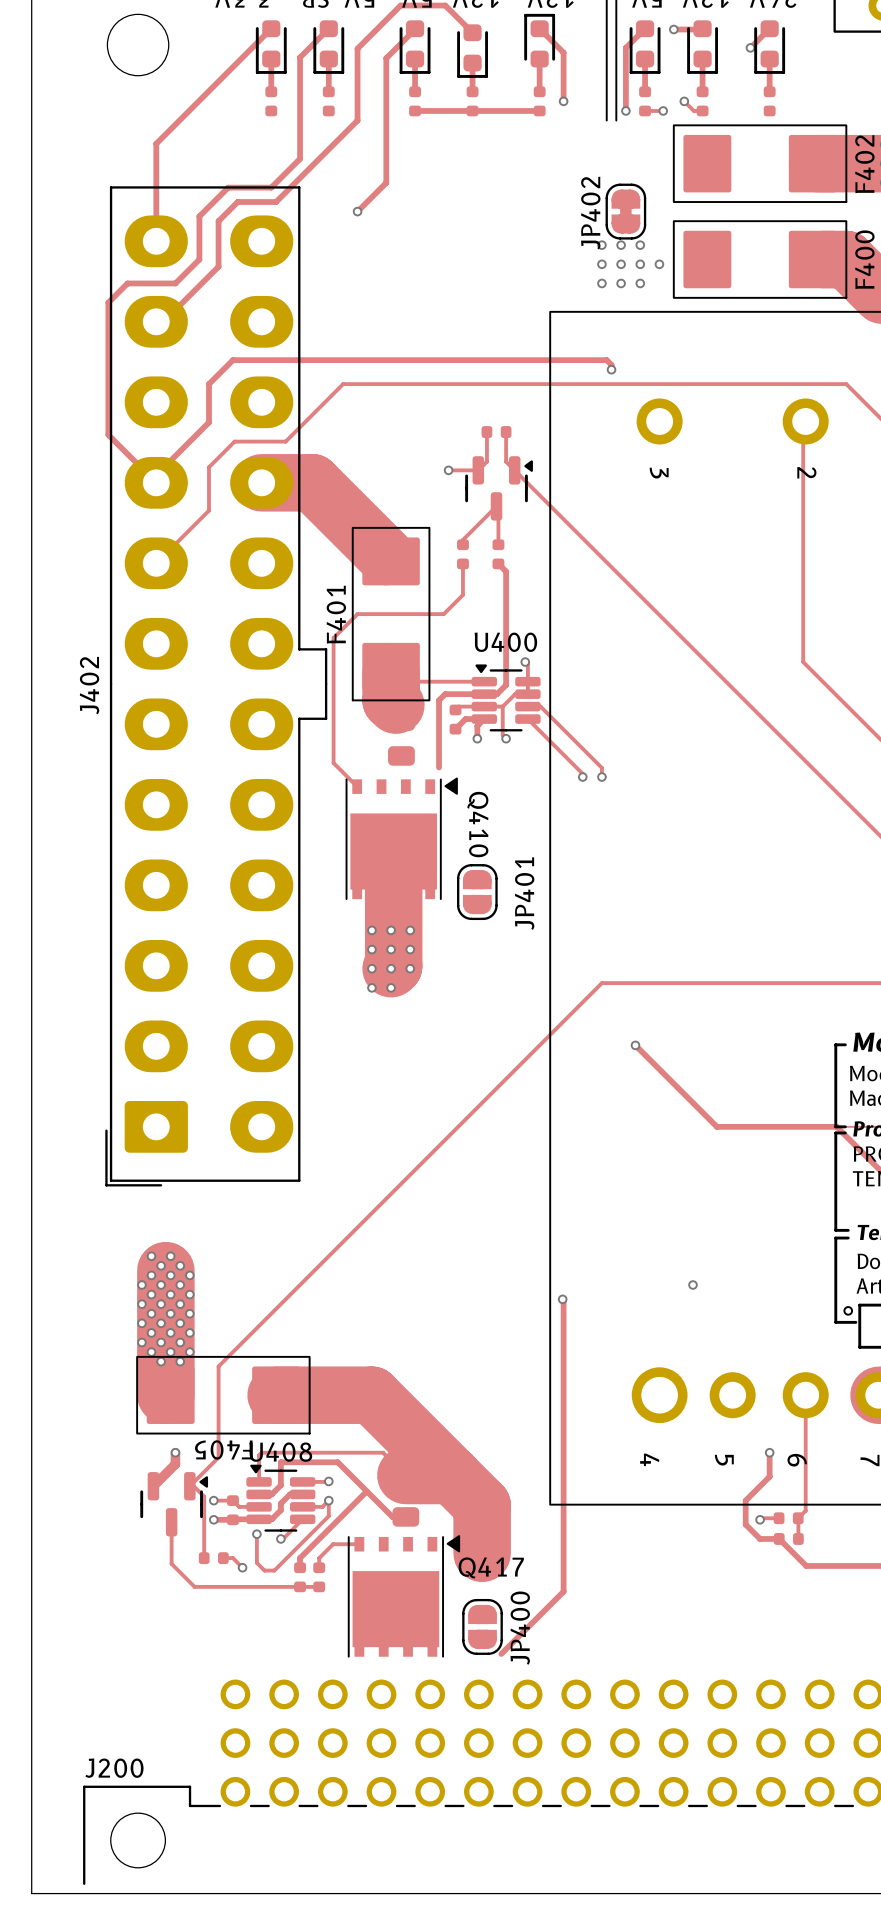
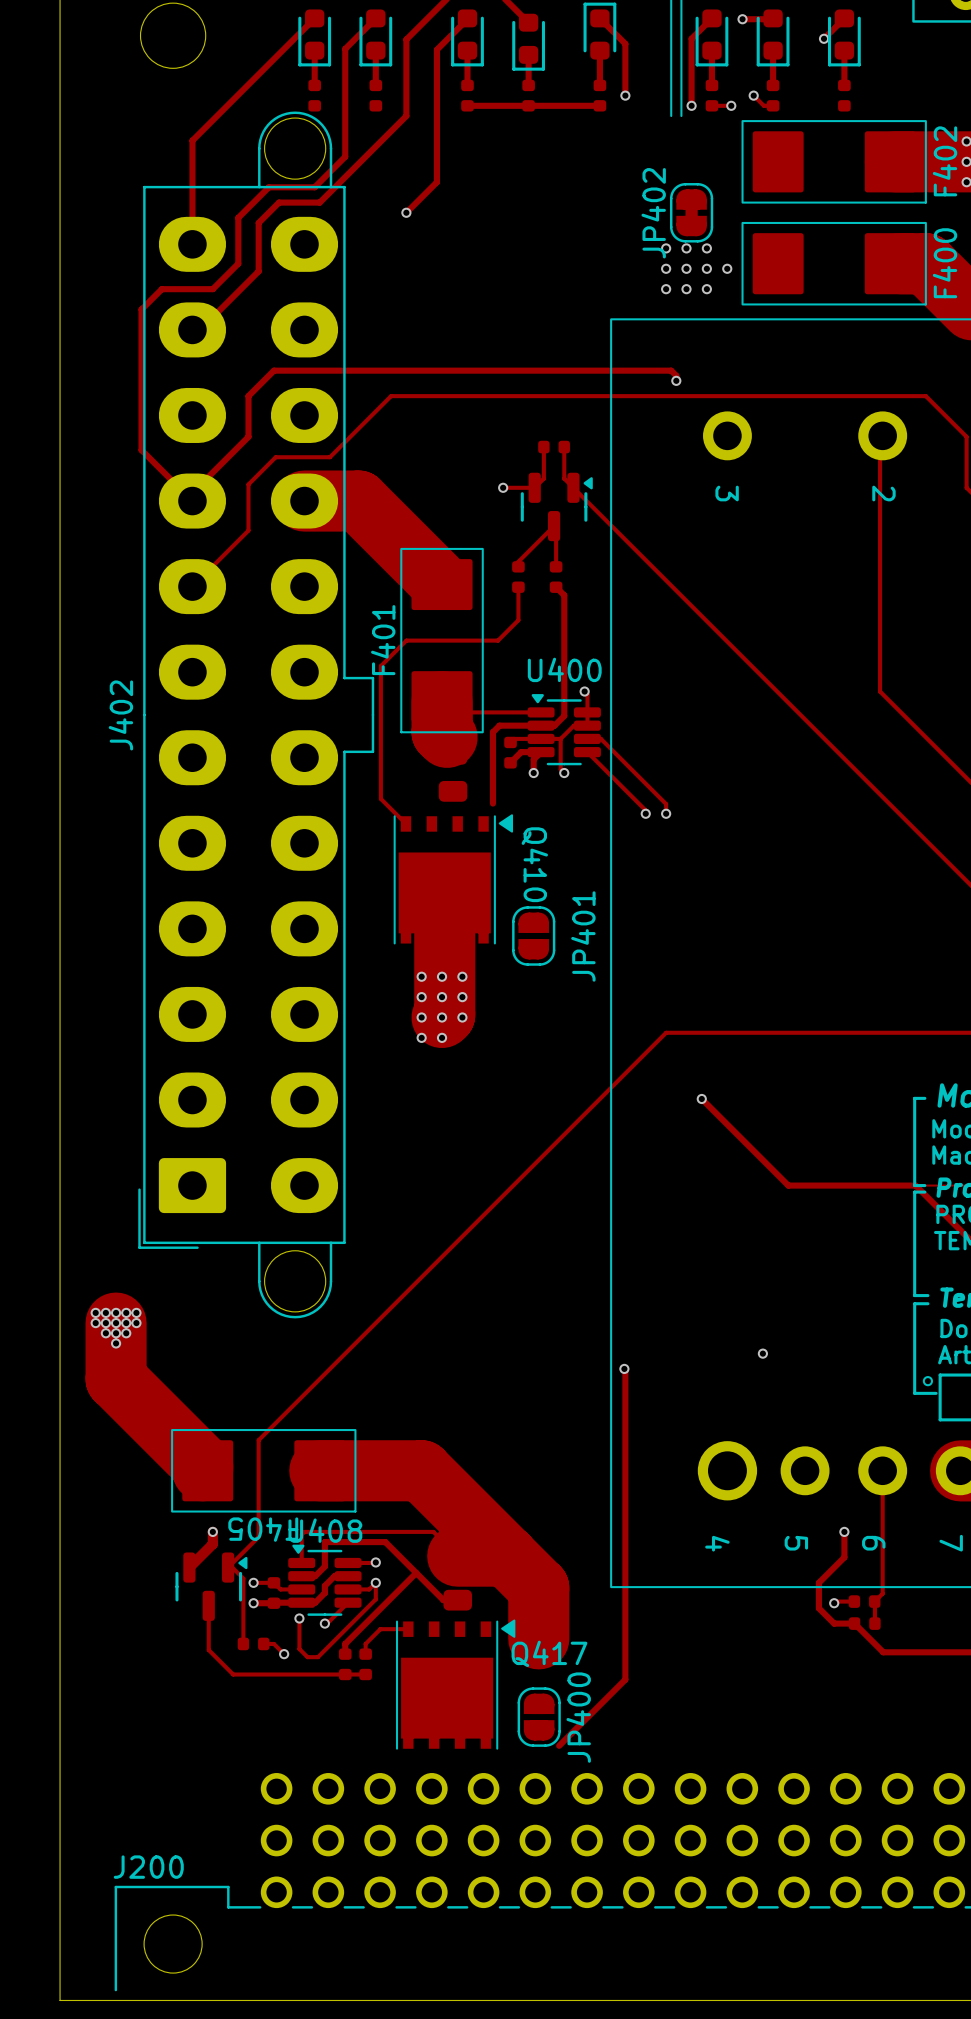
J402 footprint: [105, 186, 328, 1187] -> [138, 111, 375, 1319]
via: none -> (95, 1312)
via: none -> (105, 1312)
via: none -> (116, 1312)
via: none -> (126, 1312)
via: none -> (136, 1312)
via: none -> (95, 1323)
via: none -> (105, 1323)
via: none -> (116, 1323)
via: none -> (126, 1323)
via: none -> (136, 1323)
via: (151, 1256) -> none
via: (170, 1256) -> none
via: none -> (105, 1333)
via: none -> (116, 1333)
via: none -> (126, 1333)
via: (161, 1265) -> none
via: (180, 1265) -> none
track: (165, 1270) (165, 1390) -> (116, 1323) (116, 1379) (202, 1465)
via: none -> (116, 1343)
via: (151, 1275) -> none
via: (170, 1275) -> none
via: (189, 1275) -> none
via: (141, 1284) -> none
via: (161, 1284) -> none
via: (180, 1284) -> none
via: (151, 1294) -> none
via: (170, 1294) -> none
via: (189, 1294) -> none
via: (141, 1304) -> none
via: (161, 1304) -> none
via: (180, 1304) -> none
via: (151, 1313) -> none
via: (170, 1313) -> none
via: (189, 1313) -> none
via: (141, 1323) -> none
via: (161, 1323) -> none
via: (180, 1323) -> none
via: (151, 1332) -> none
via: (170, 1332) -> none
via: (189, 1332) -> none
via: (141, 1342) -> none
via: (161, 1342) -> none
via: (180, 1342) -> none
via: (151, 1352) -> none
via: (170, 1352) -> none
via: (189, 1352) -> none
via: (161, 1361) -> none
via: (180, 1361) -> none

